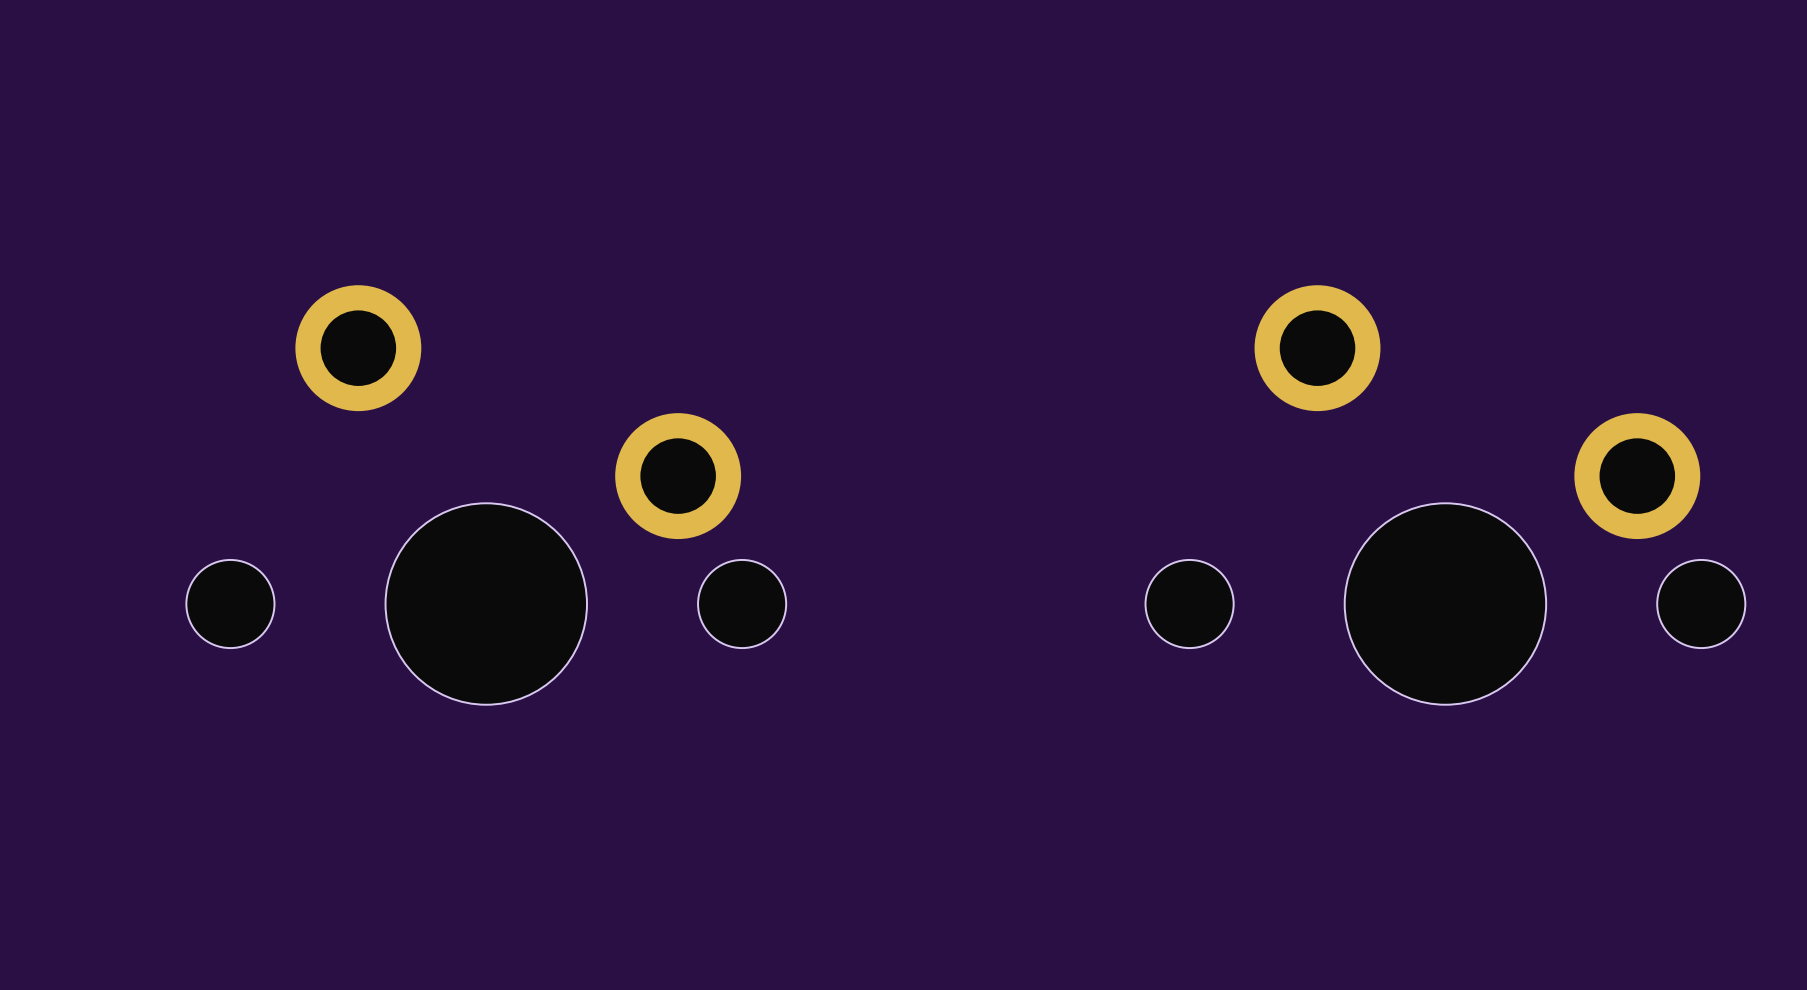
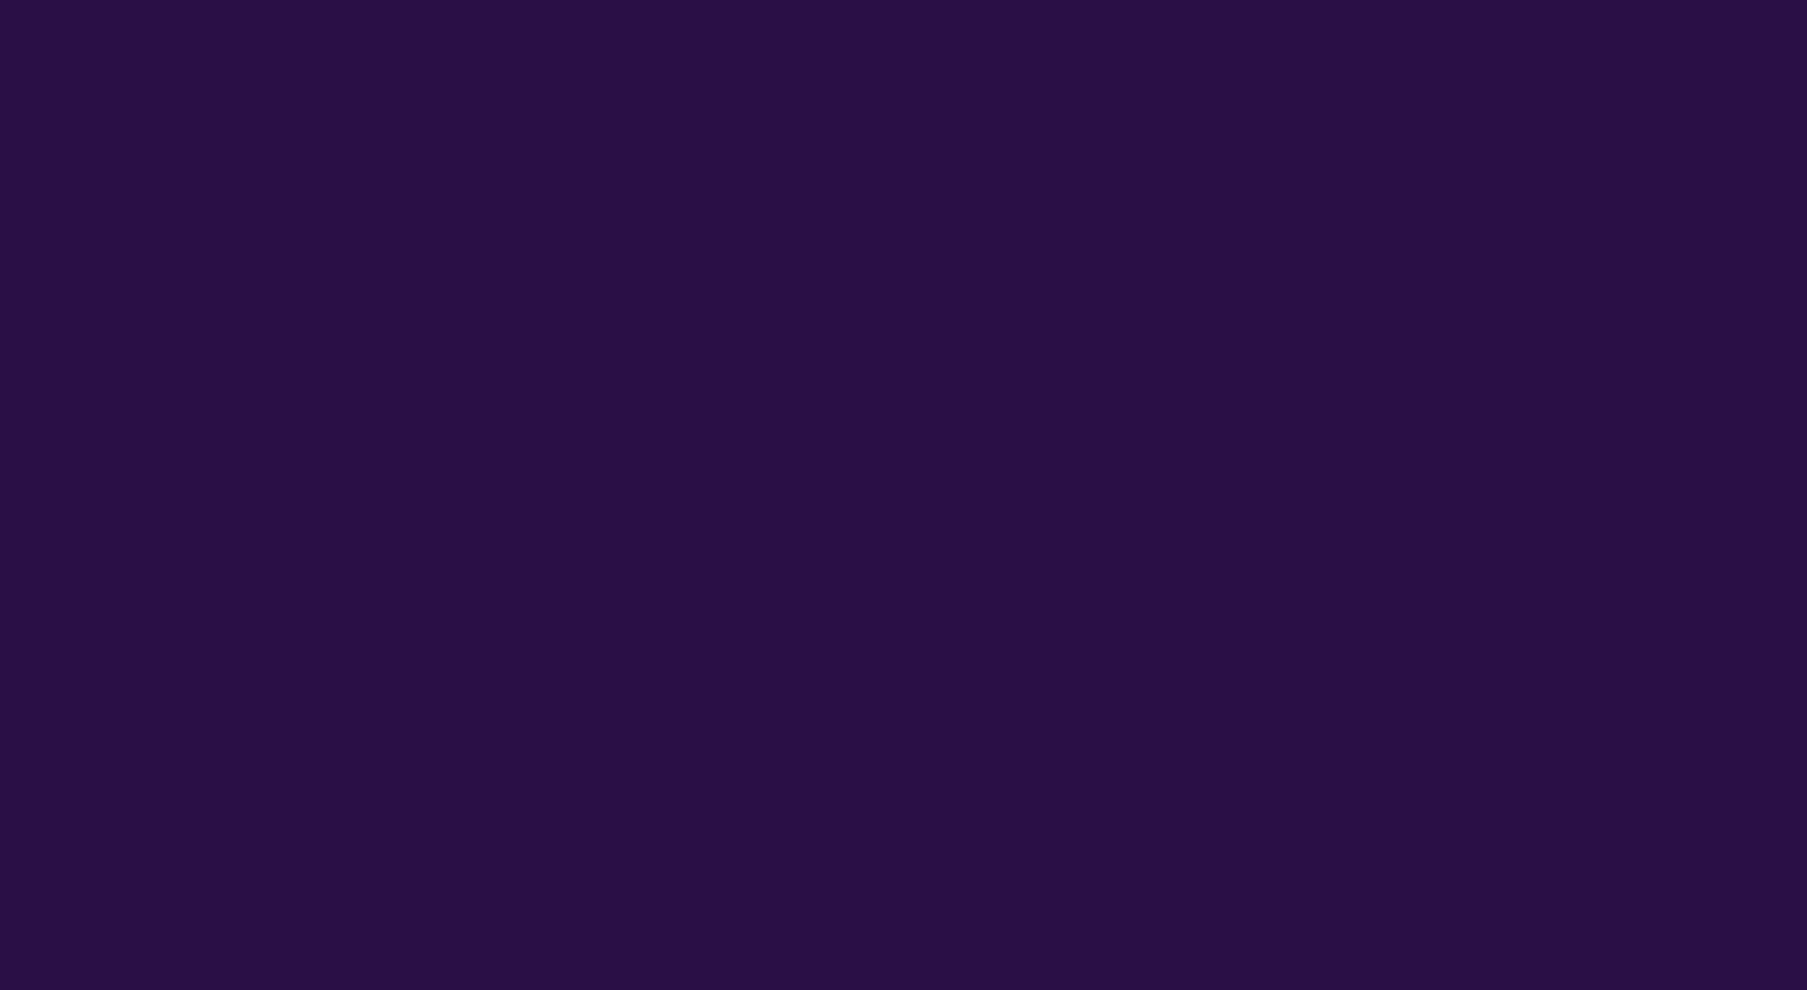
part: (486, 494) -> none
part: (1445, 494) -> none

